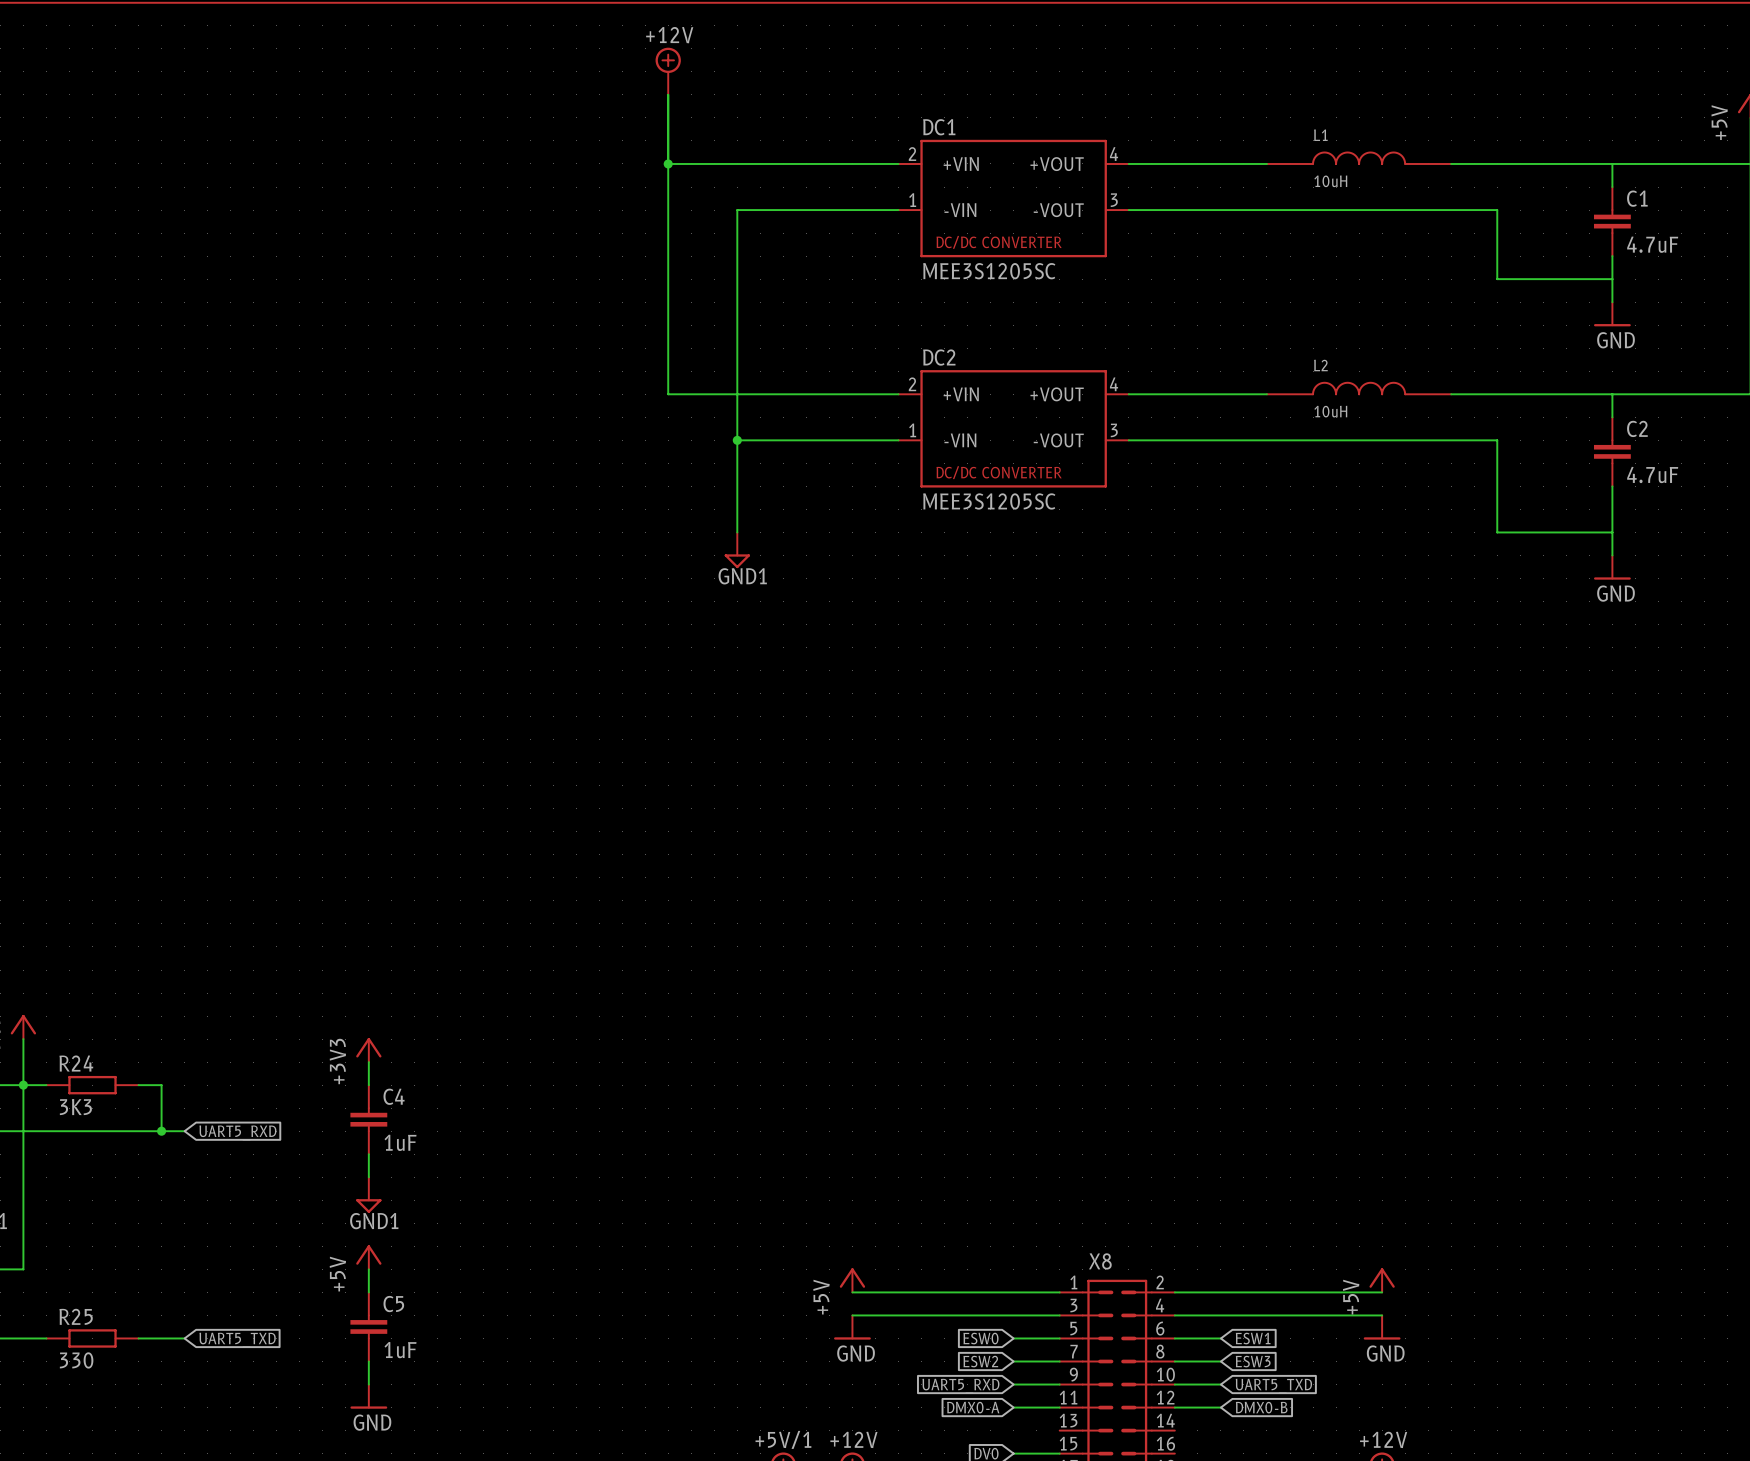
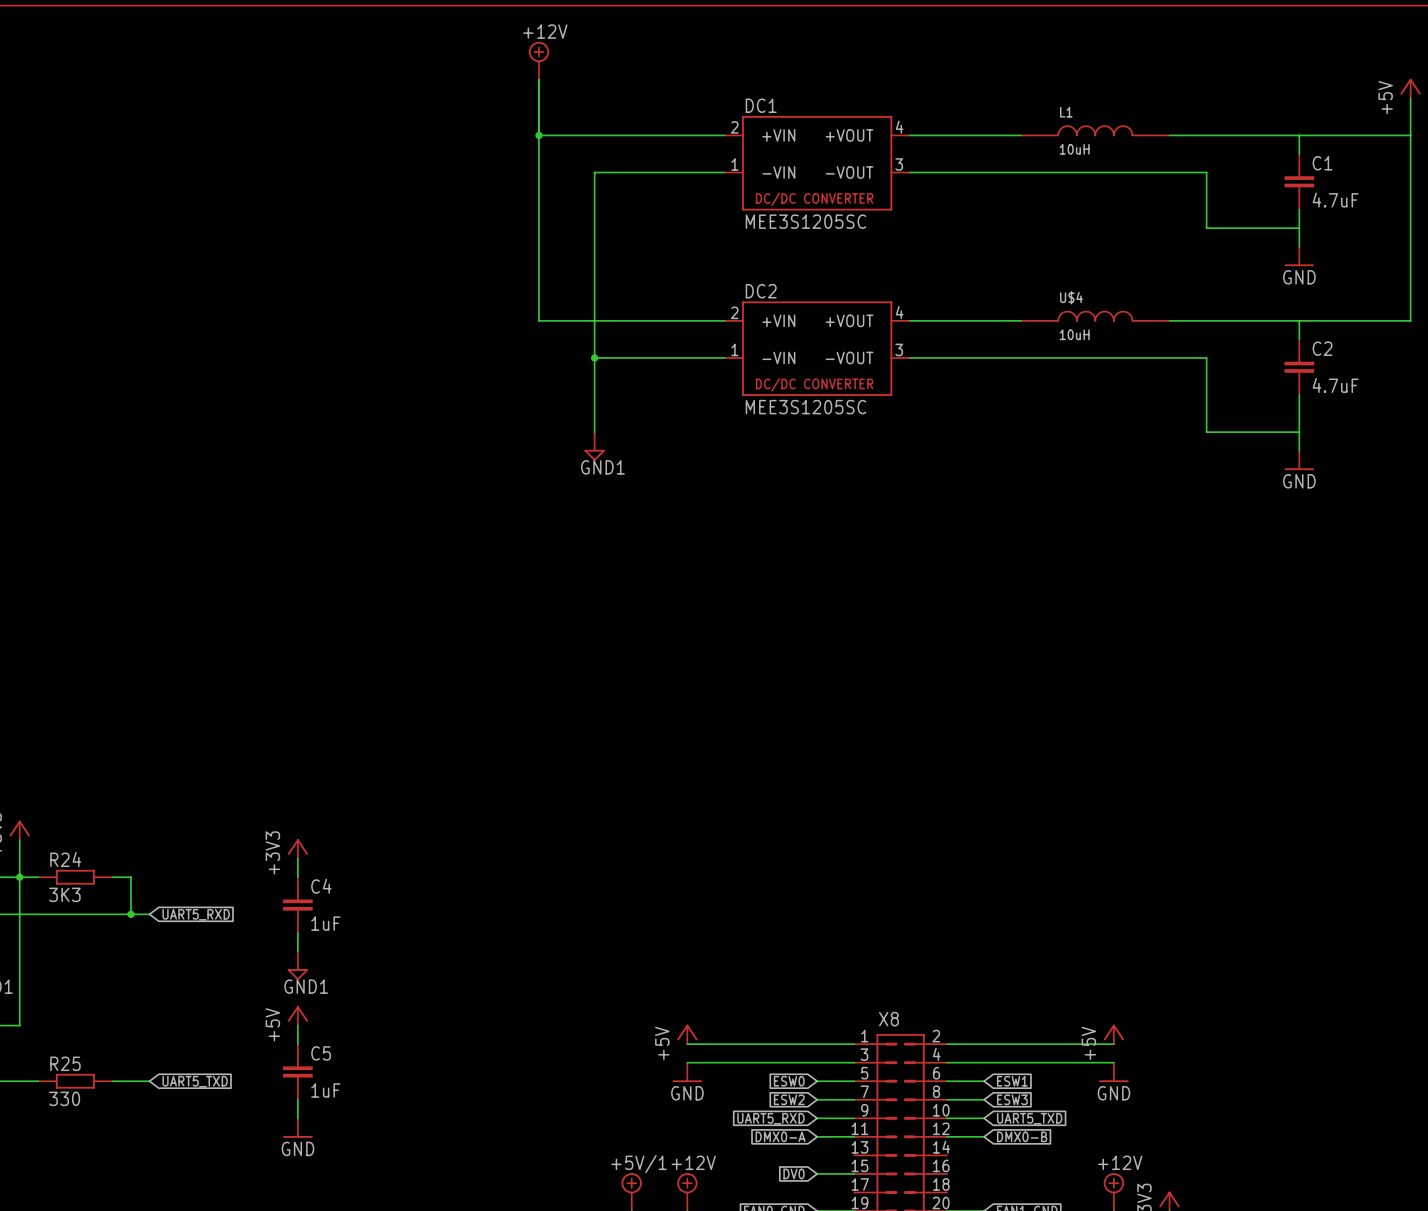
L2 name: L2 (1320, 365) -> U$4 (1071, 297)

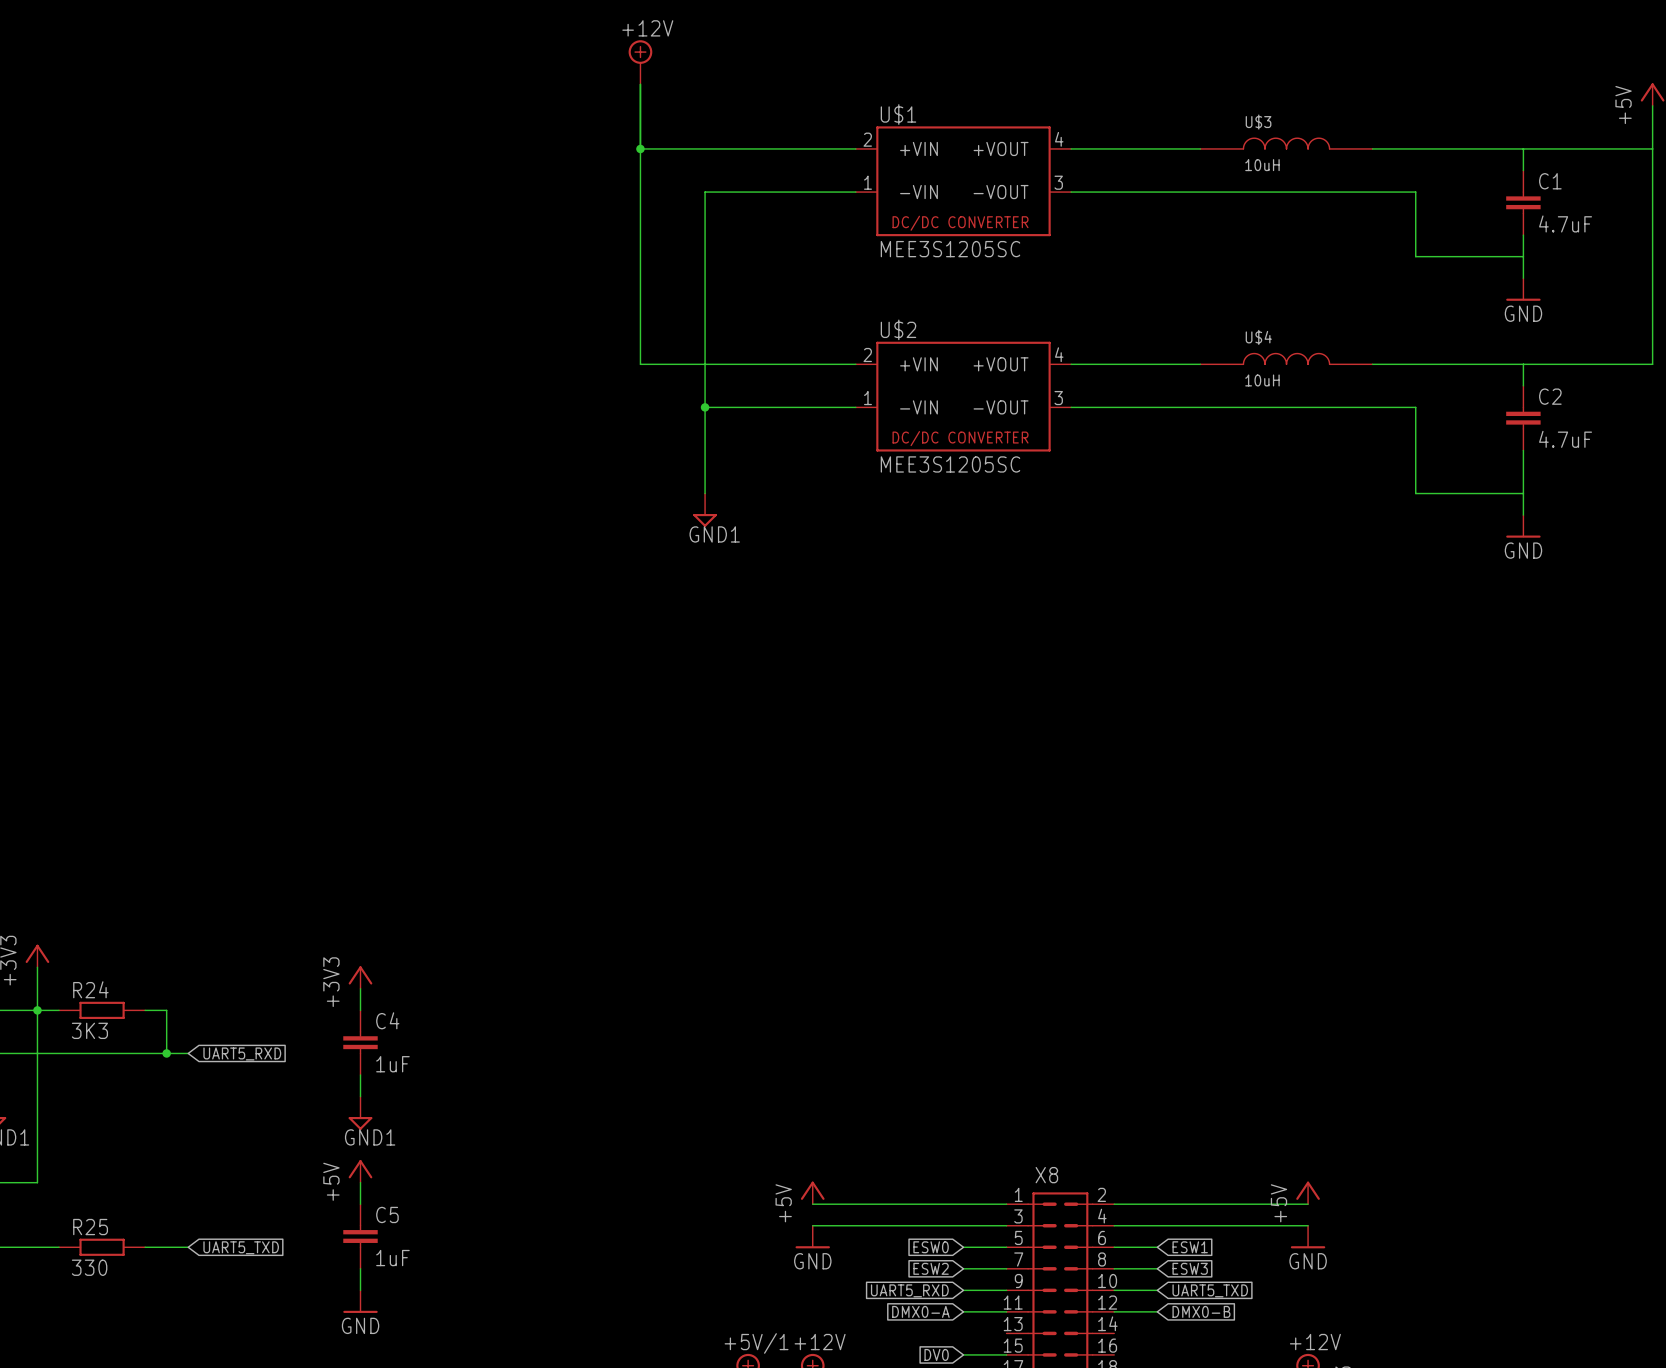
DC1 name: DC1 (761, 105) -> U$1 (898, 114)
L1 name: L1 (1066, 112) -> U$3 (1258, 122)
DC2 name: DC2 (761, 291) -> U$2 (898, 329)

